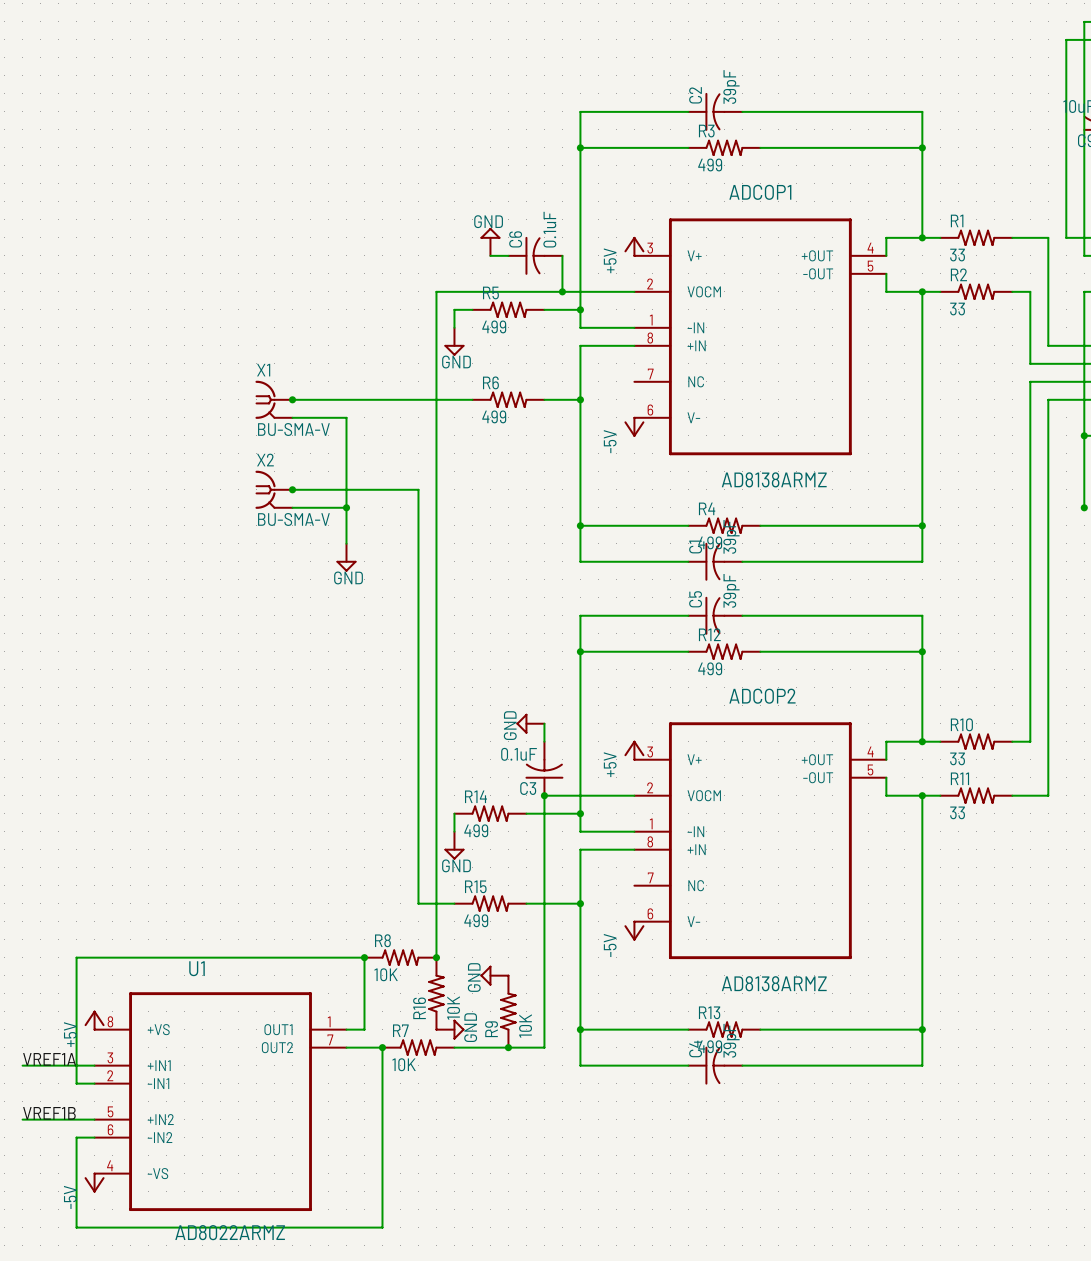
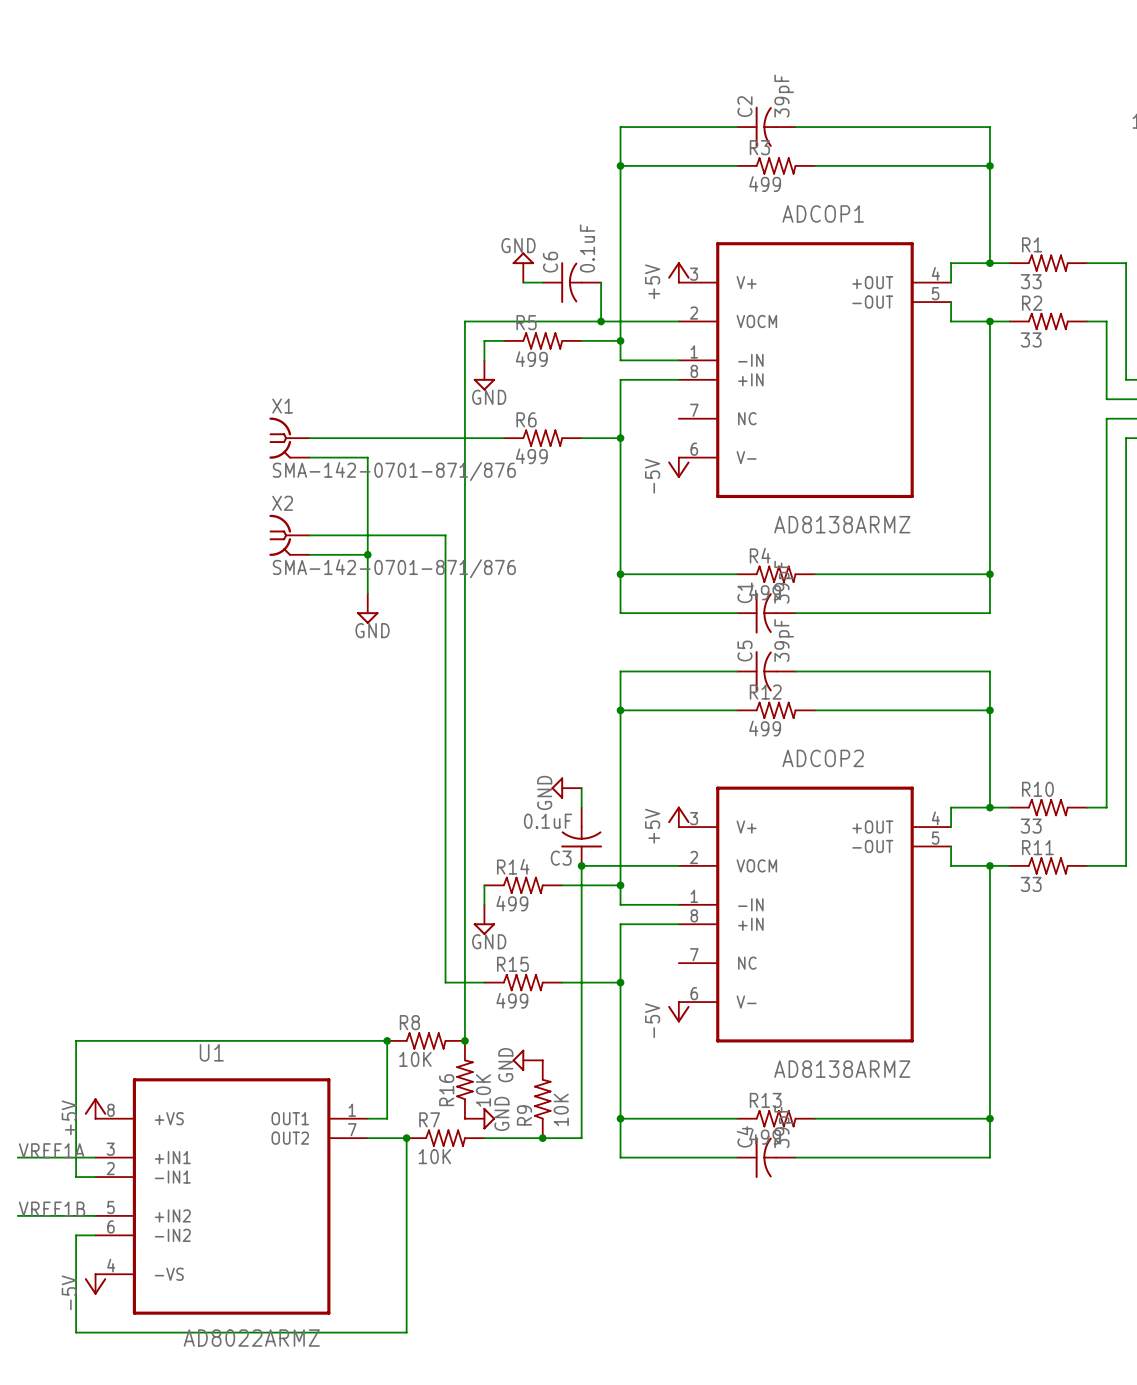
junction: (292, 399) -> none
X1 value: BU-SMA-V (293, 429) -> SMA-142-0701-871/876 (394, 471)
junction: (292, 489) -> none
X2 value: BU-SMA-V (293, 519) -> SMA-142-0701-871/876 (394, 568)

